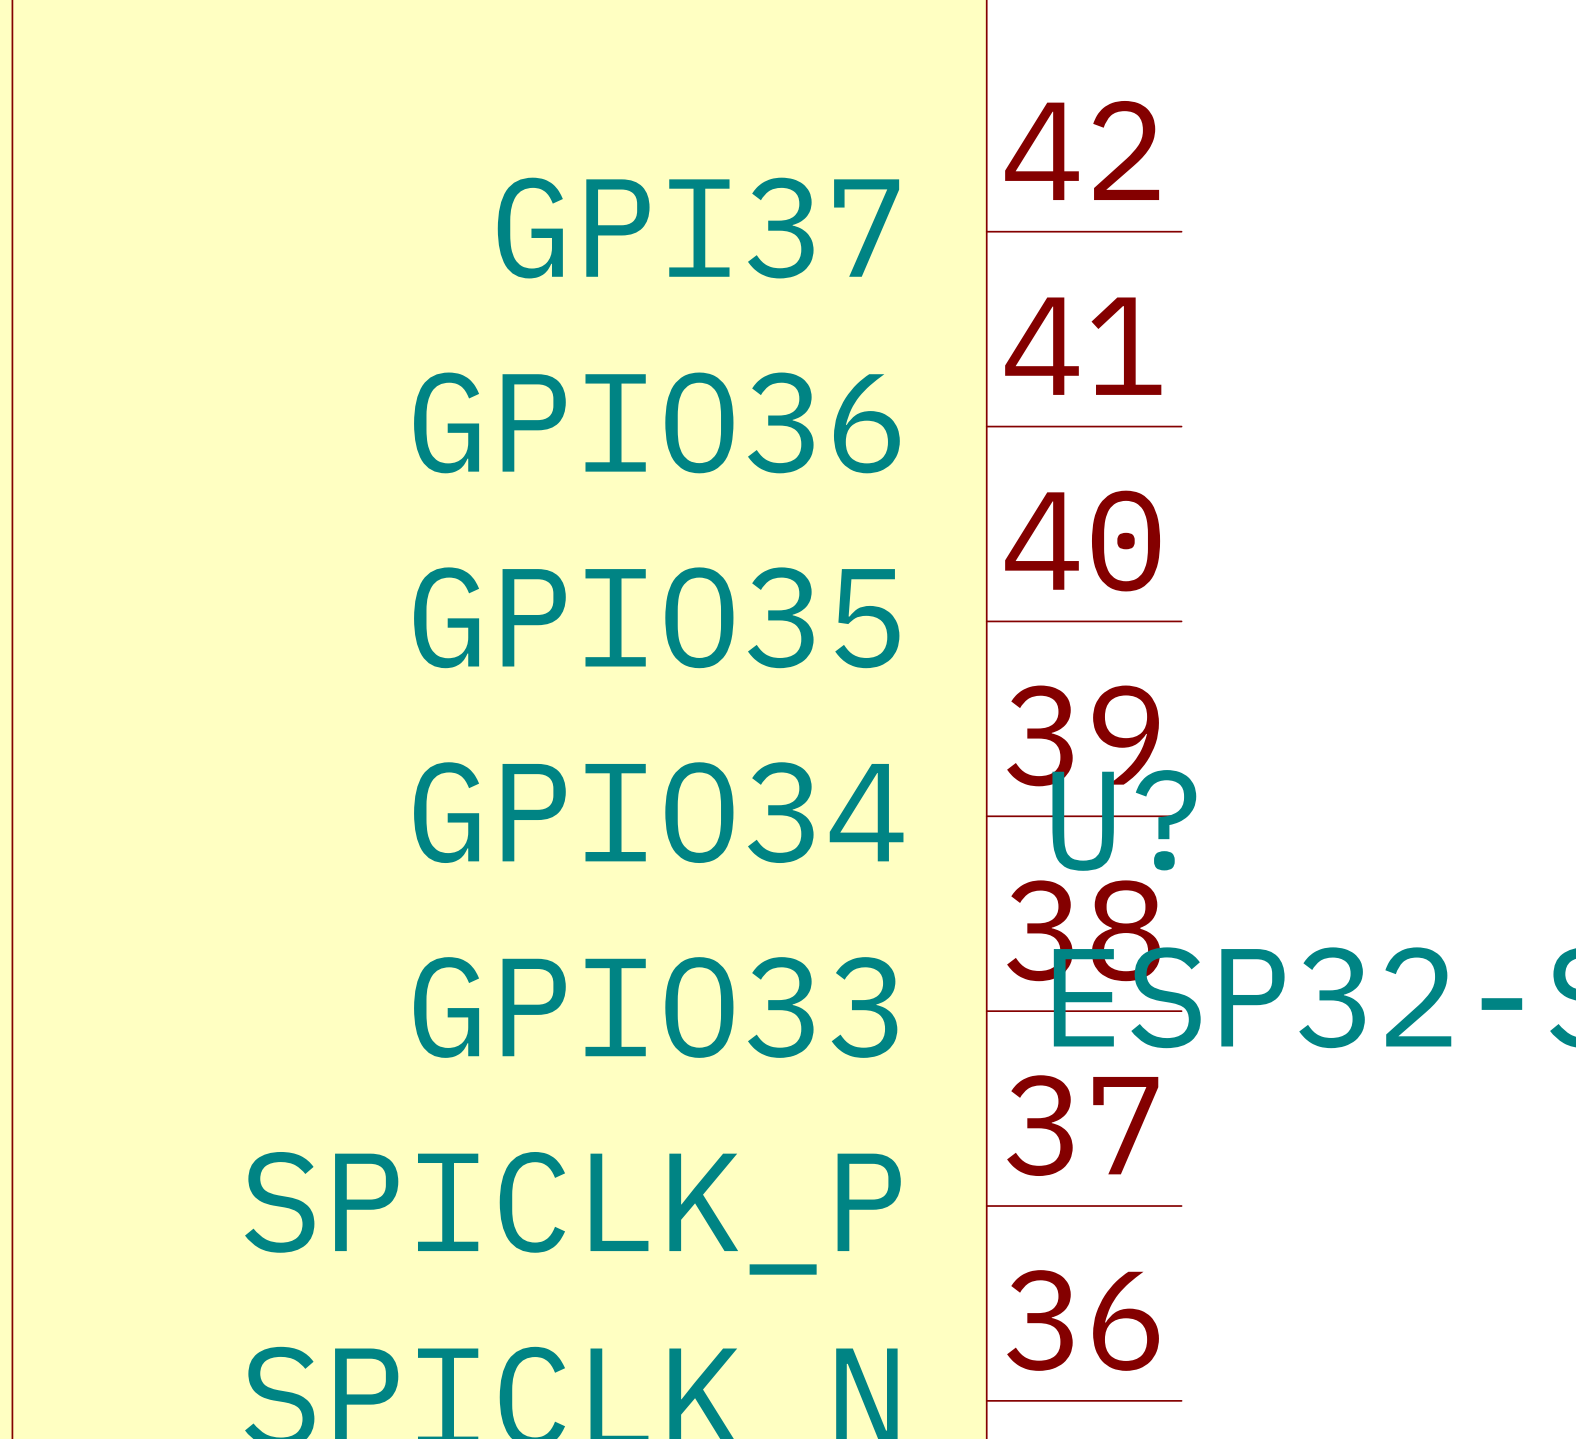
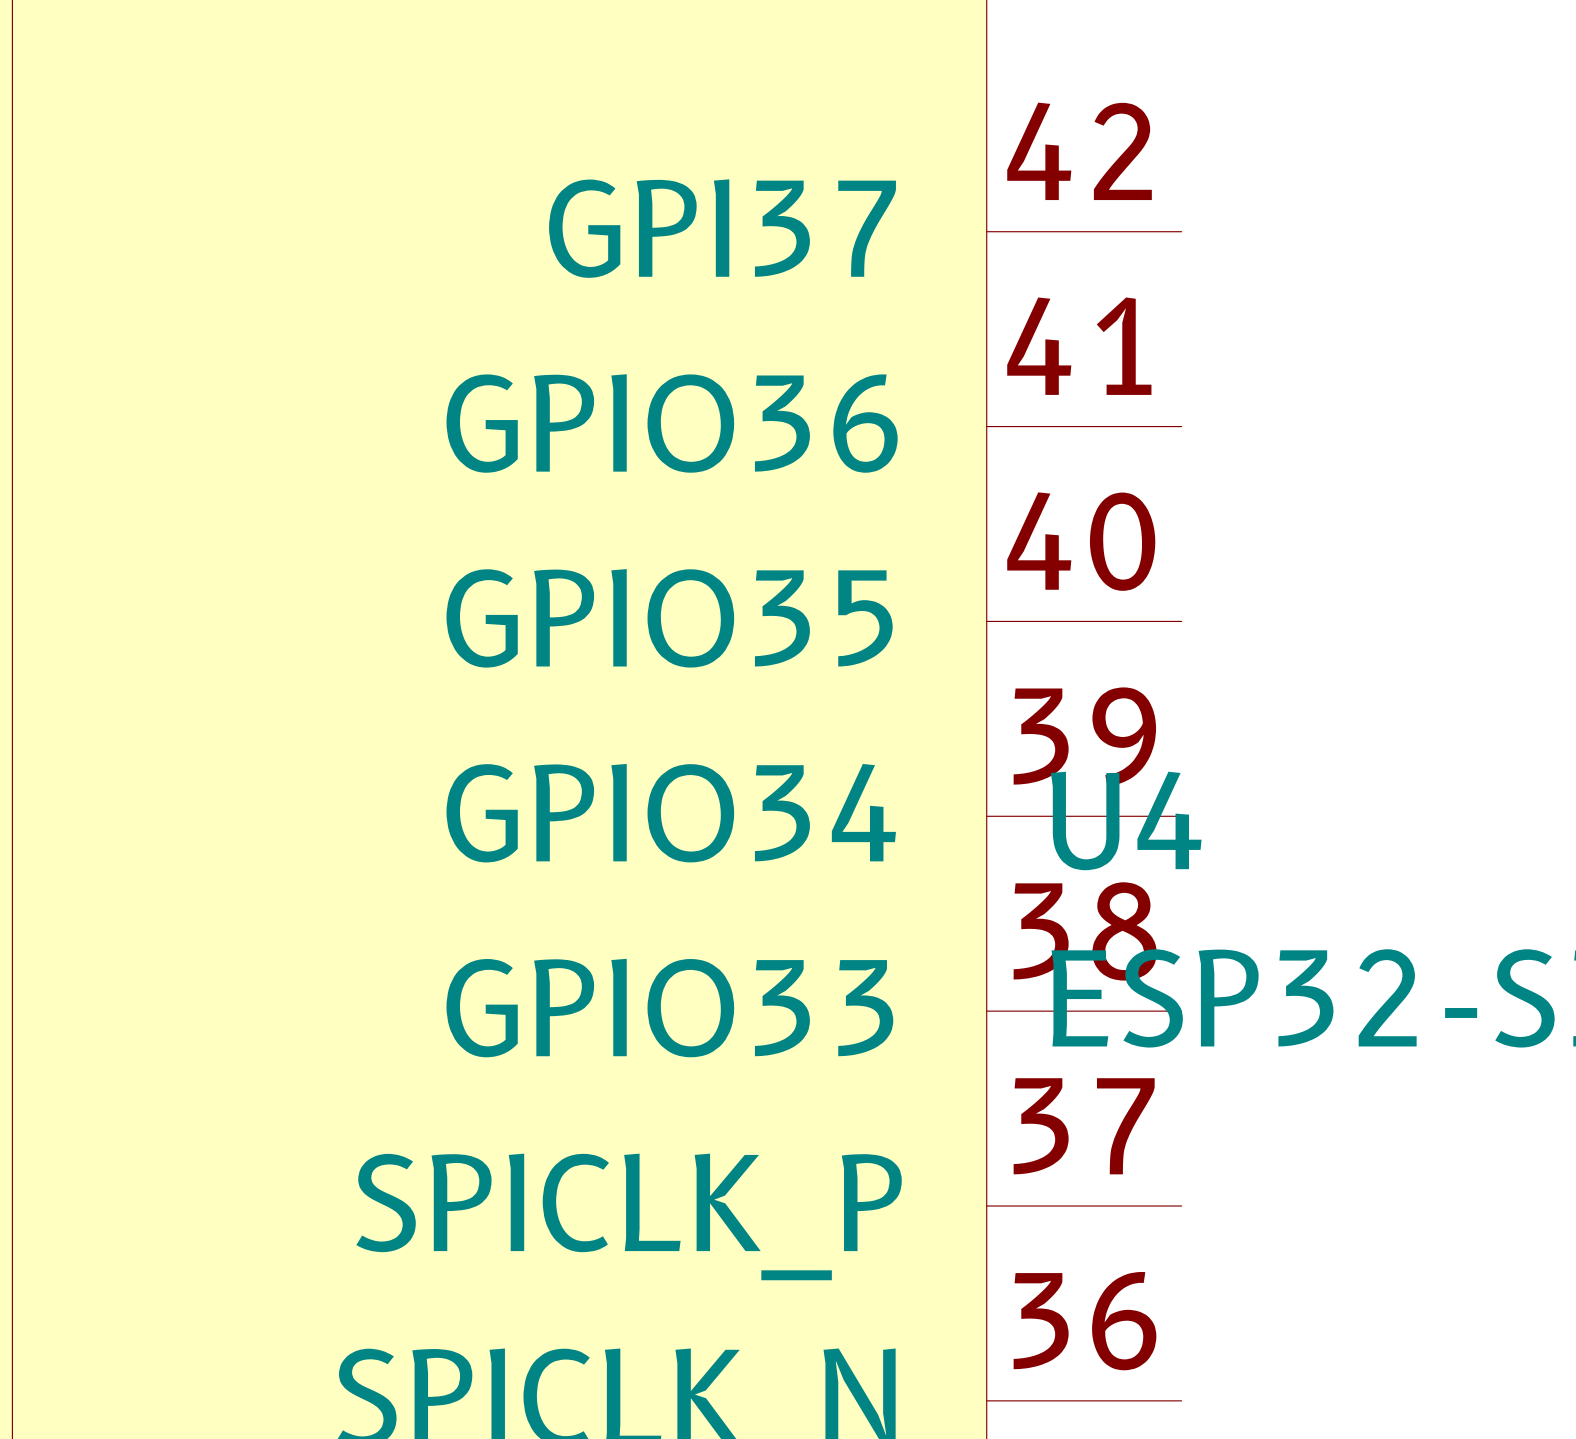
U? name: U? (1124, 820) -> U4 (1126, 820)

